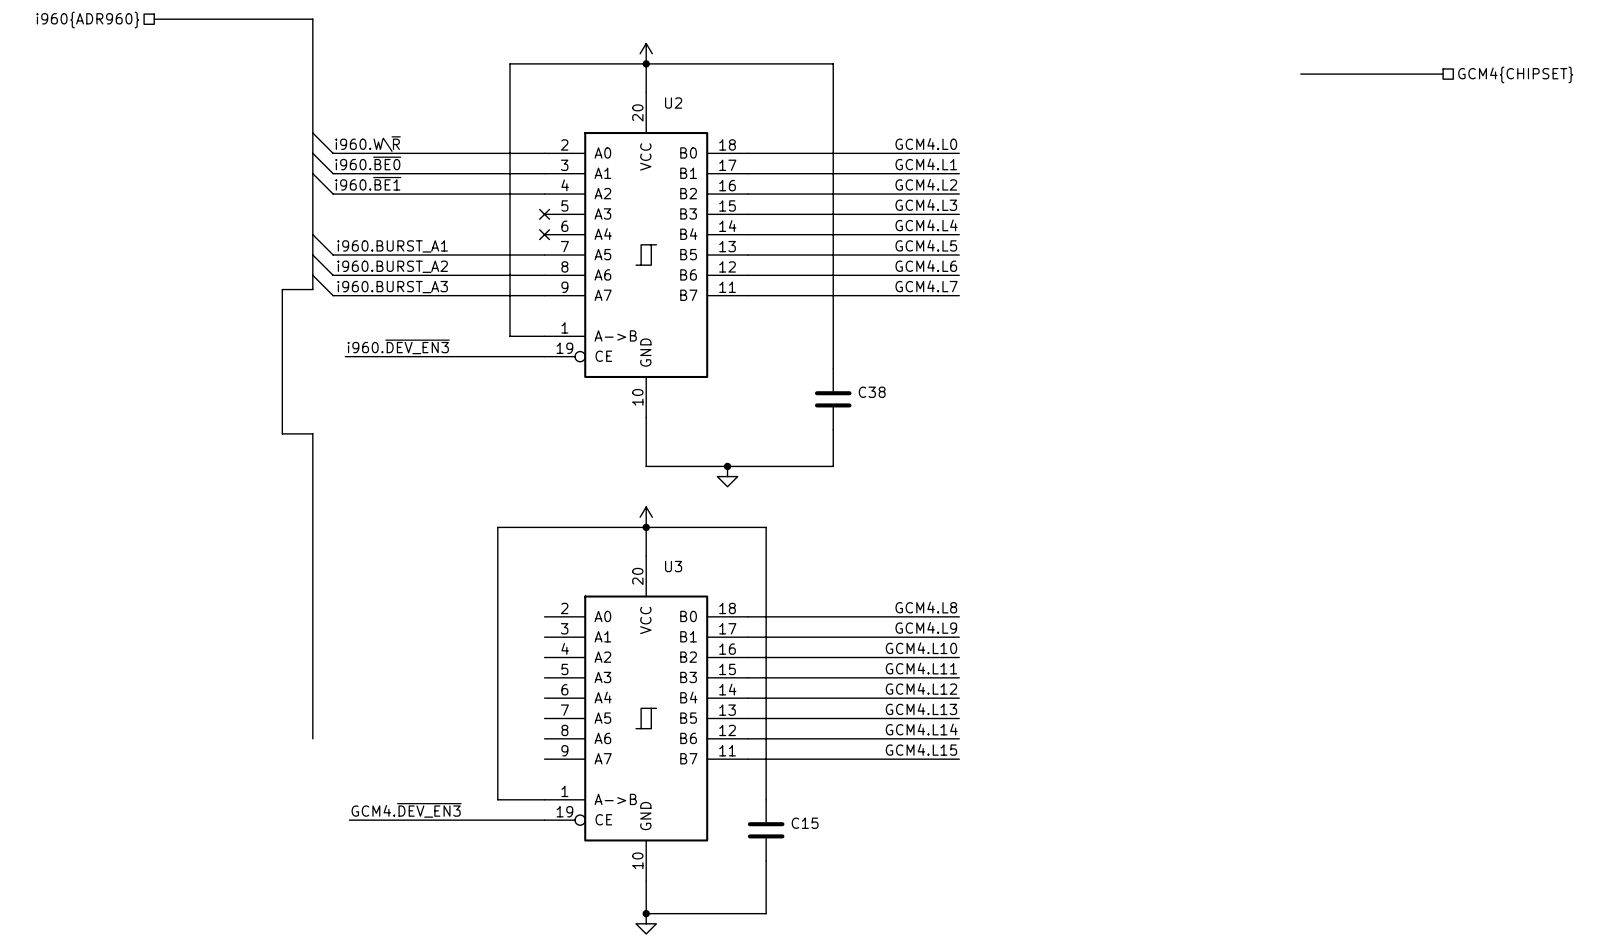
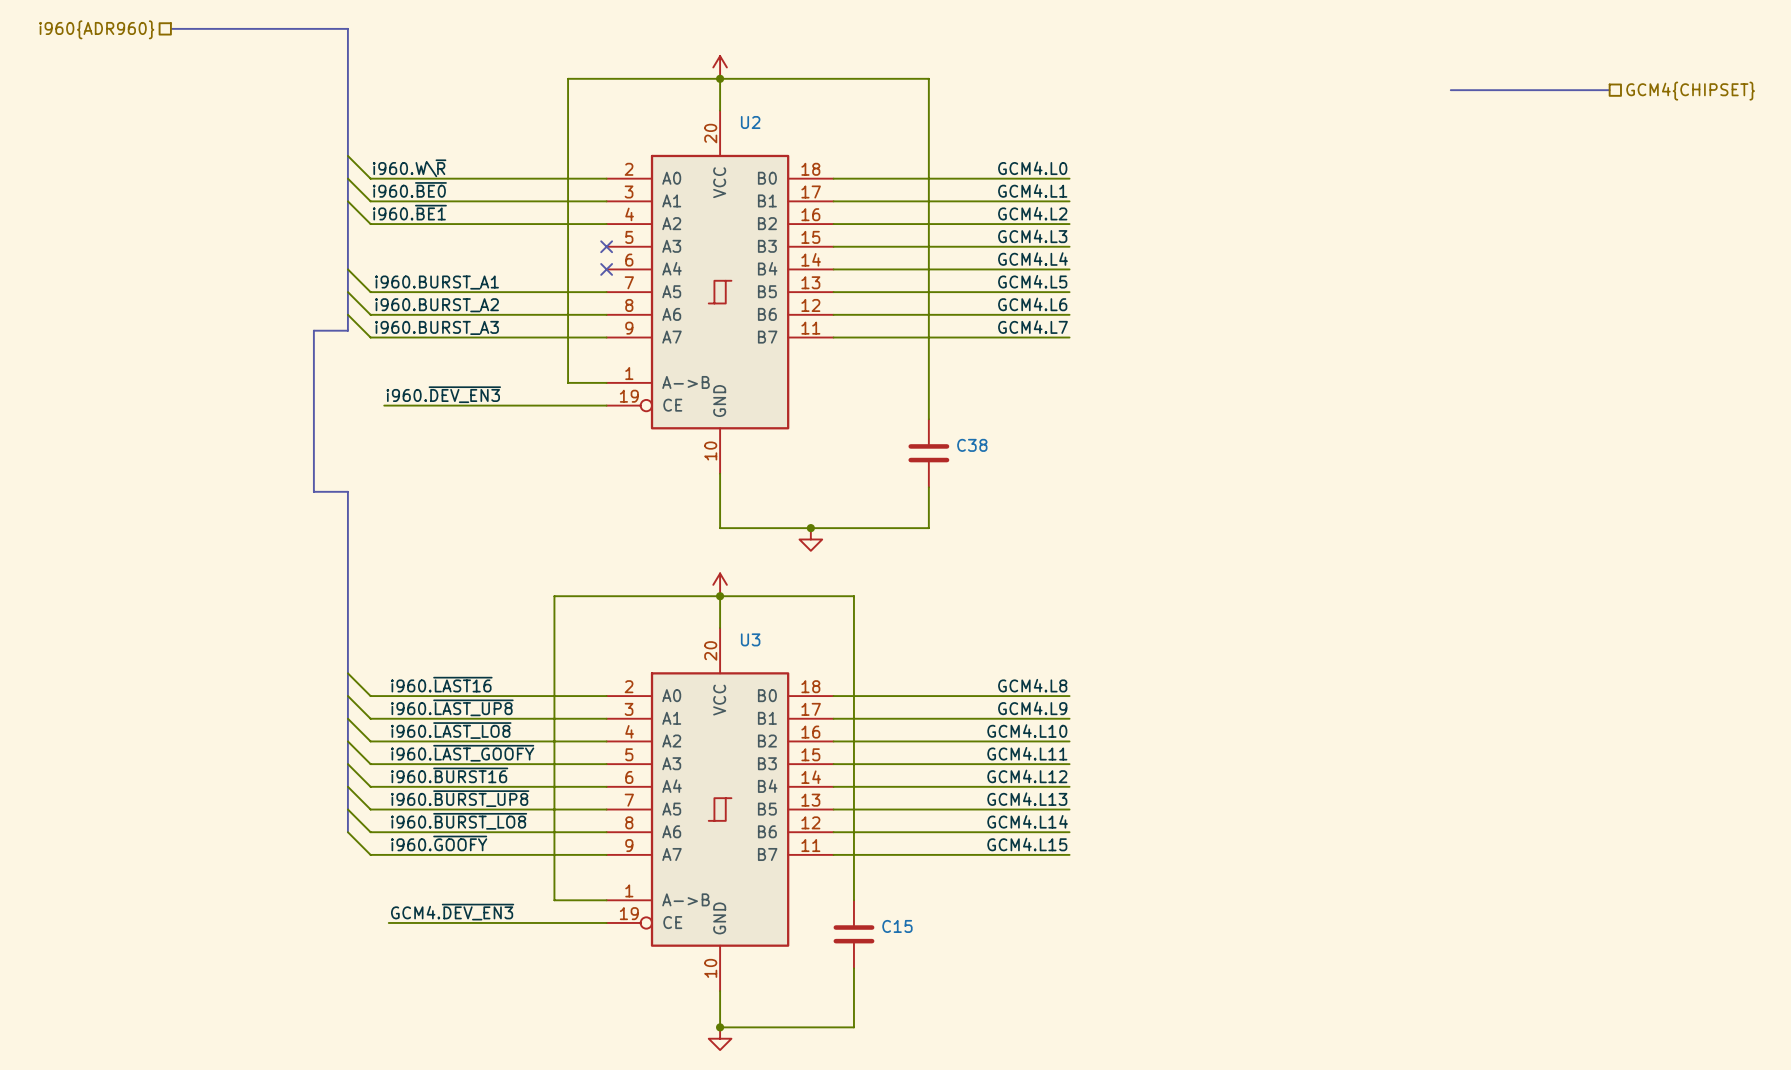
wire: none -> (347, 673) (370, 696) (606, 696)
label: none -> i960.~{LAST16} (441, 684)
wire: none -> (347, 696) (370, 718) (606, 718)
label: none -> i960.~{LAST_UP8} (452, 707)
wire: none -> (347, 718) (370, 741) (606, 741)
label: none -> i960.~{LAST_LO8} (451, 730)
wire: none -> (347, 741) (370, 764) (606, 764)
label: none -> i960.~{LAST_GOOFY} (462, 753)
wire: none -> (347, 764) (370, 786) (606, 786)
label: none -> i960.~{BURST16} (449, 775)
wire: none -> (347, 786) (370, 809) (606, 809)
label: none -> i960.~{BURST_UP8} (460, 798)
wire: none -> (347, 809) (370, 832) (606, 832)
label: none -> i960.~{BURST_LO8} (459, 821)
wire: none -> (347, 832) (370, 854) (606, 854)
label: none -> i960.~{GOOFY} (439, 843)

